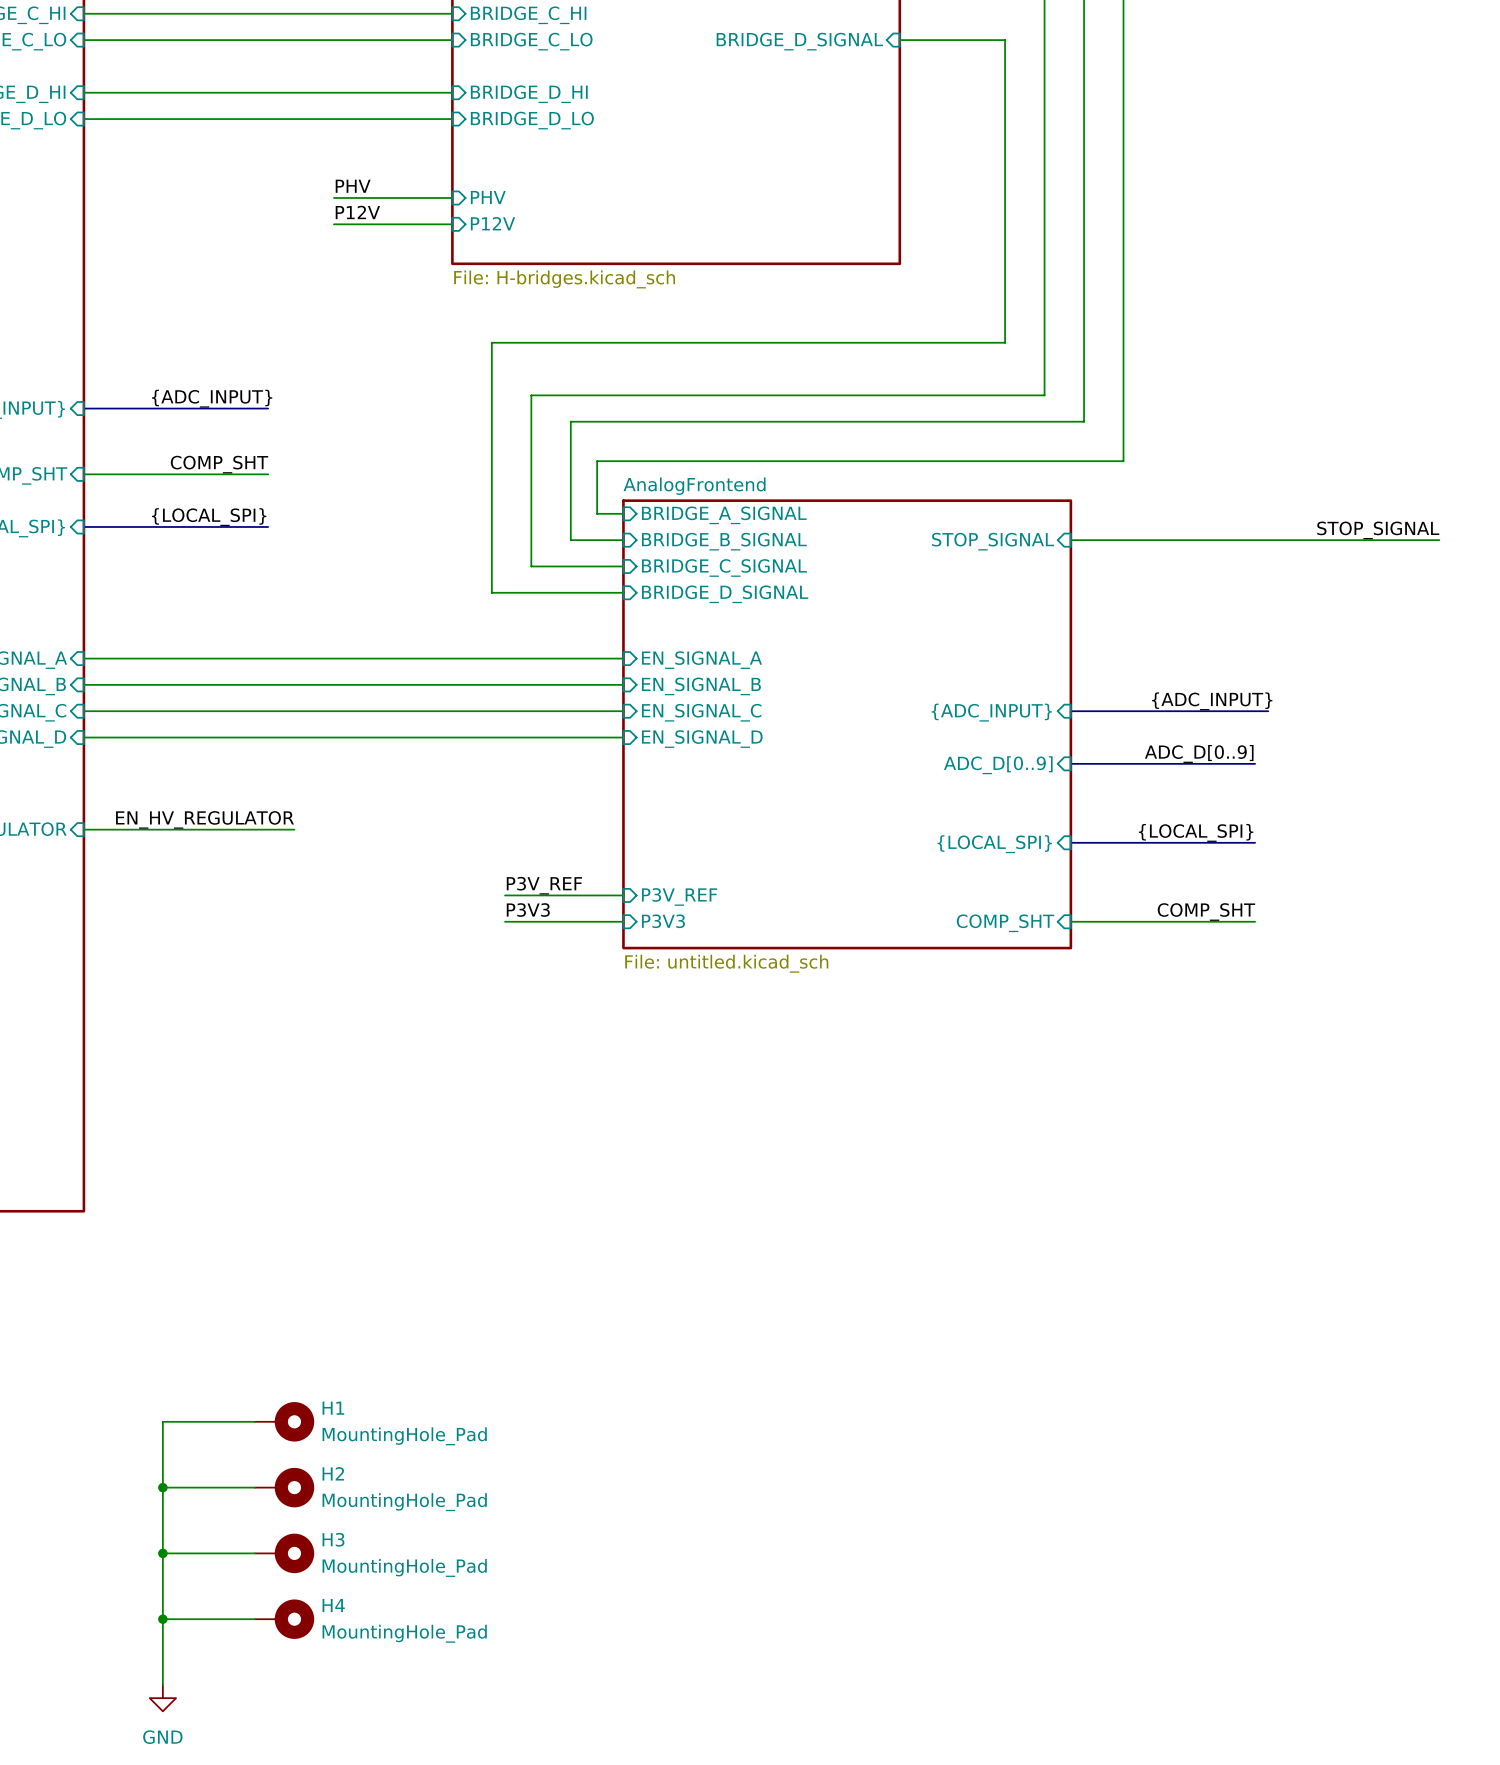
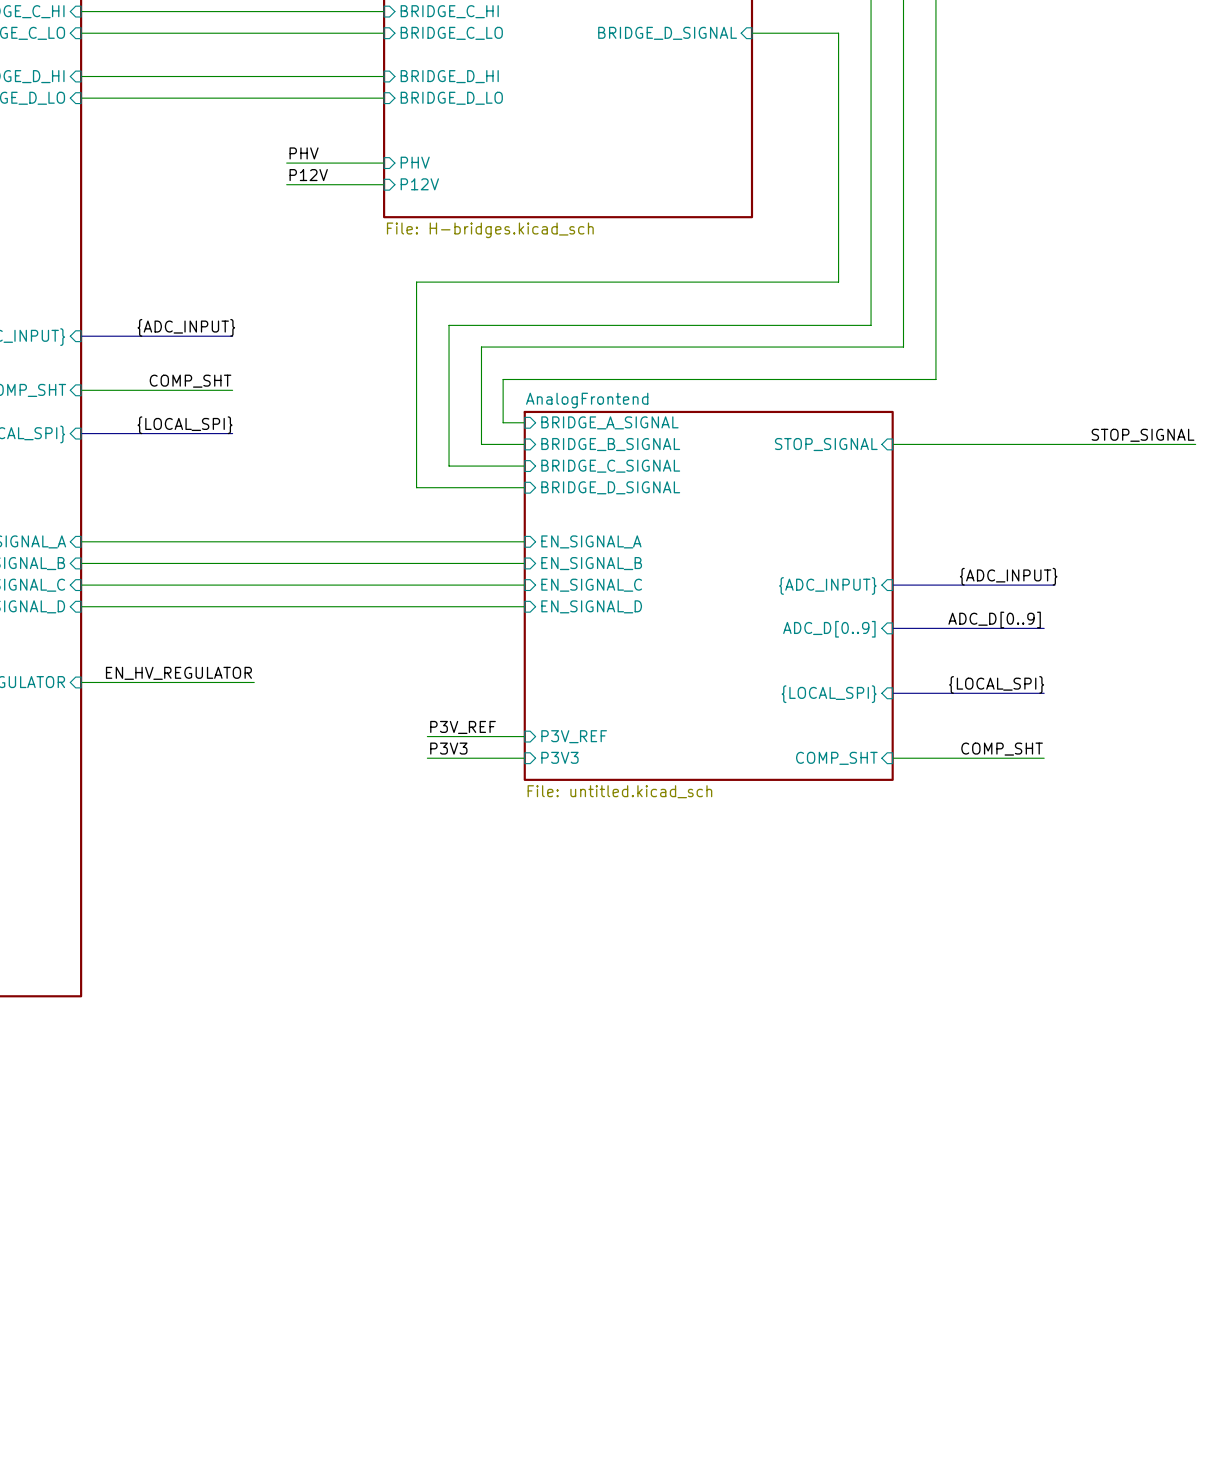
wire: (254, 1421) (162, 1421) (162, 1685) -> none
H1: MountingHole_Pad (284, 1421) -> none
wire: (162, 1487) (254, 1487) -> none
junction: (162, 1487) -> none
H2: MountingHole_Pad (284, 1487) -> none
wire: (162, 1553) (254, 1553) -> none
junction: (162, 1553) -> none
H3: MountingHole_Pad (284, 1553) -> none
wire: (162, 1619) (254, 1619) -> none
junction: (162, 1619) -> none
H4: MountingHole_Pad (284, 1619) -> none
power symbol: GND (162, 1698) -> none

